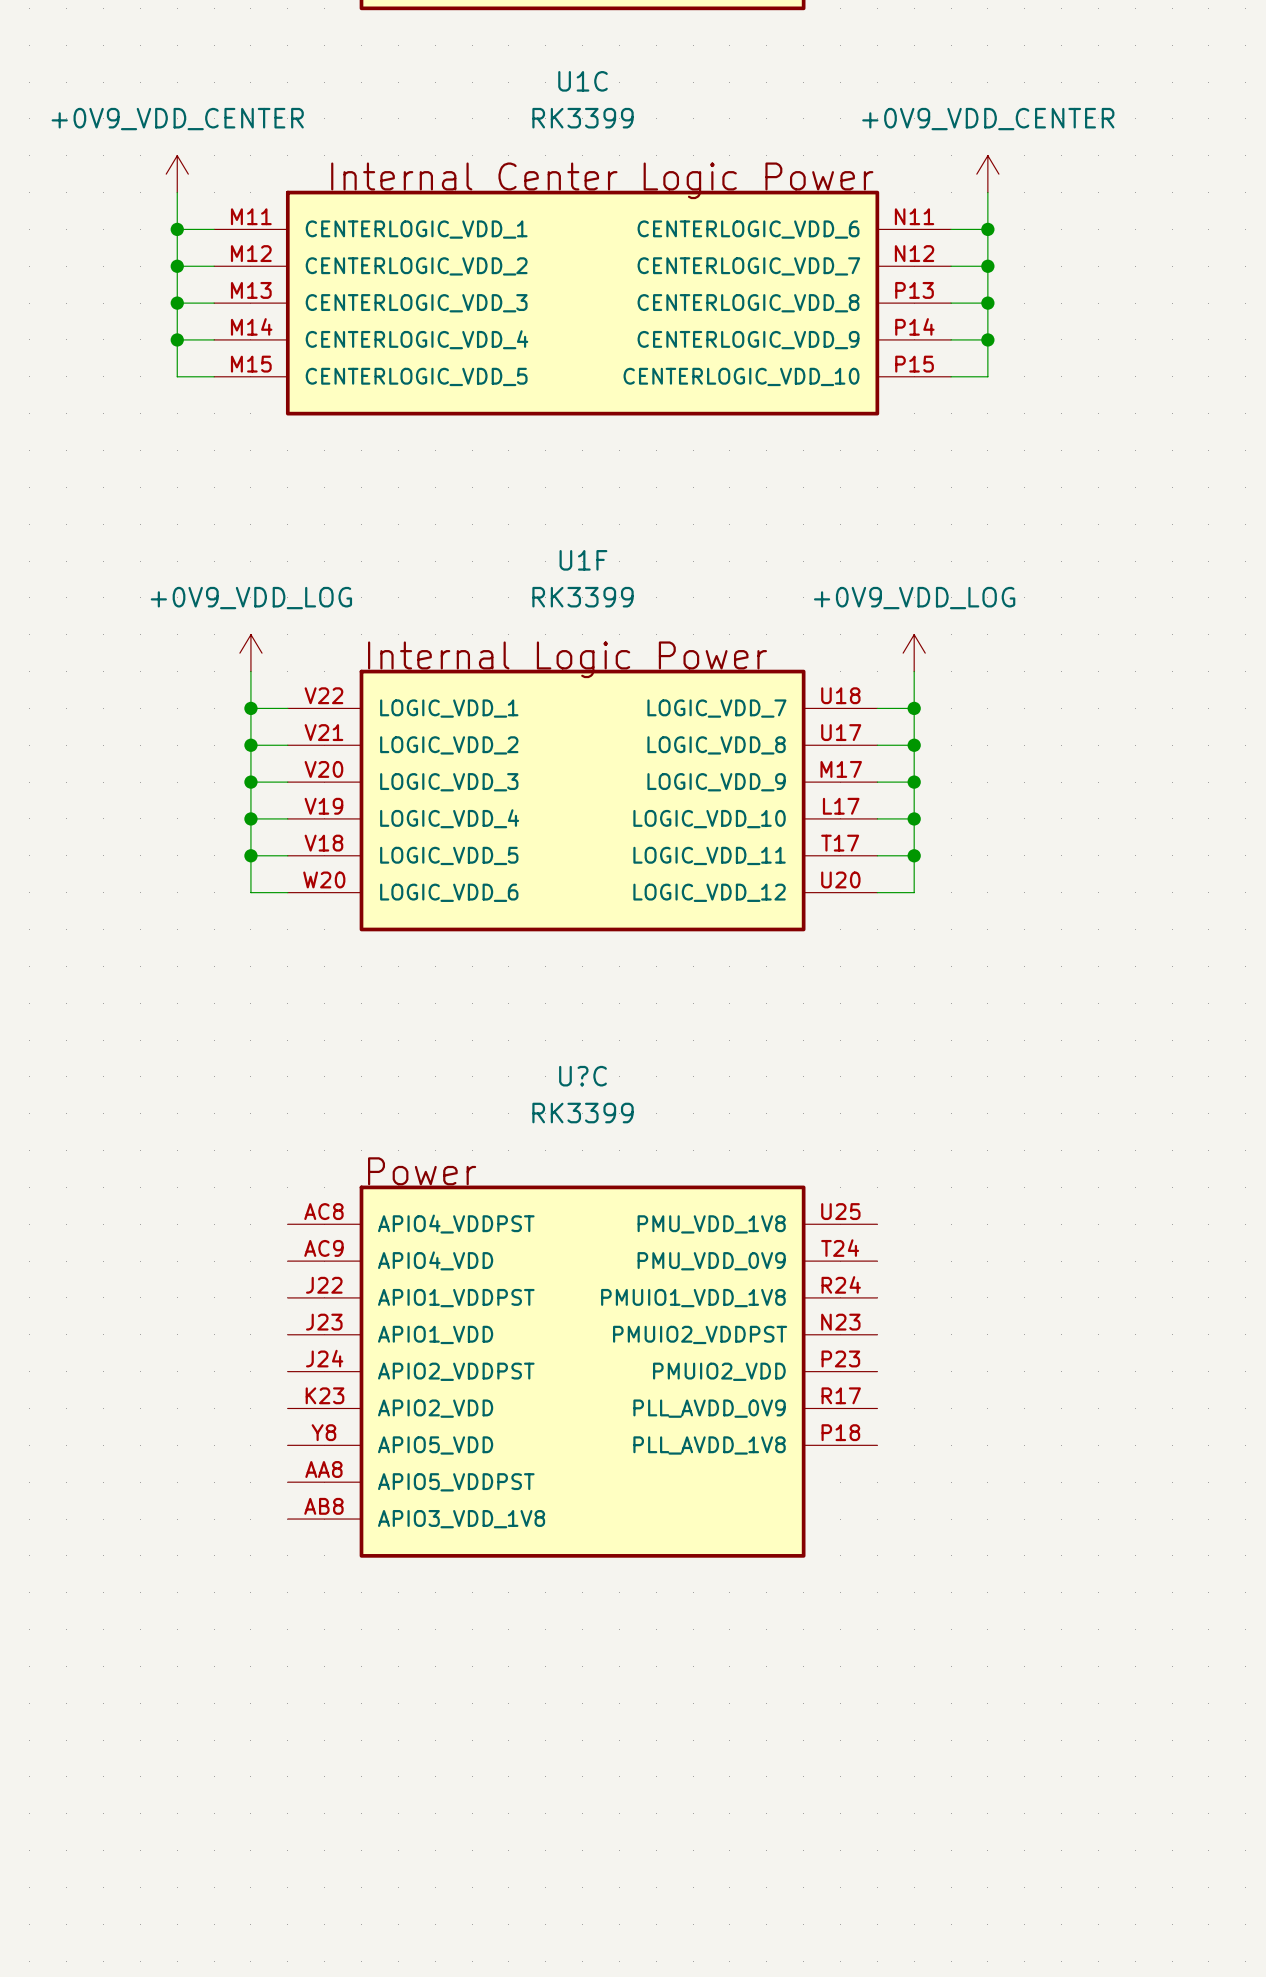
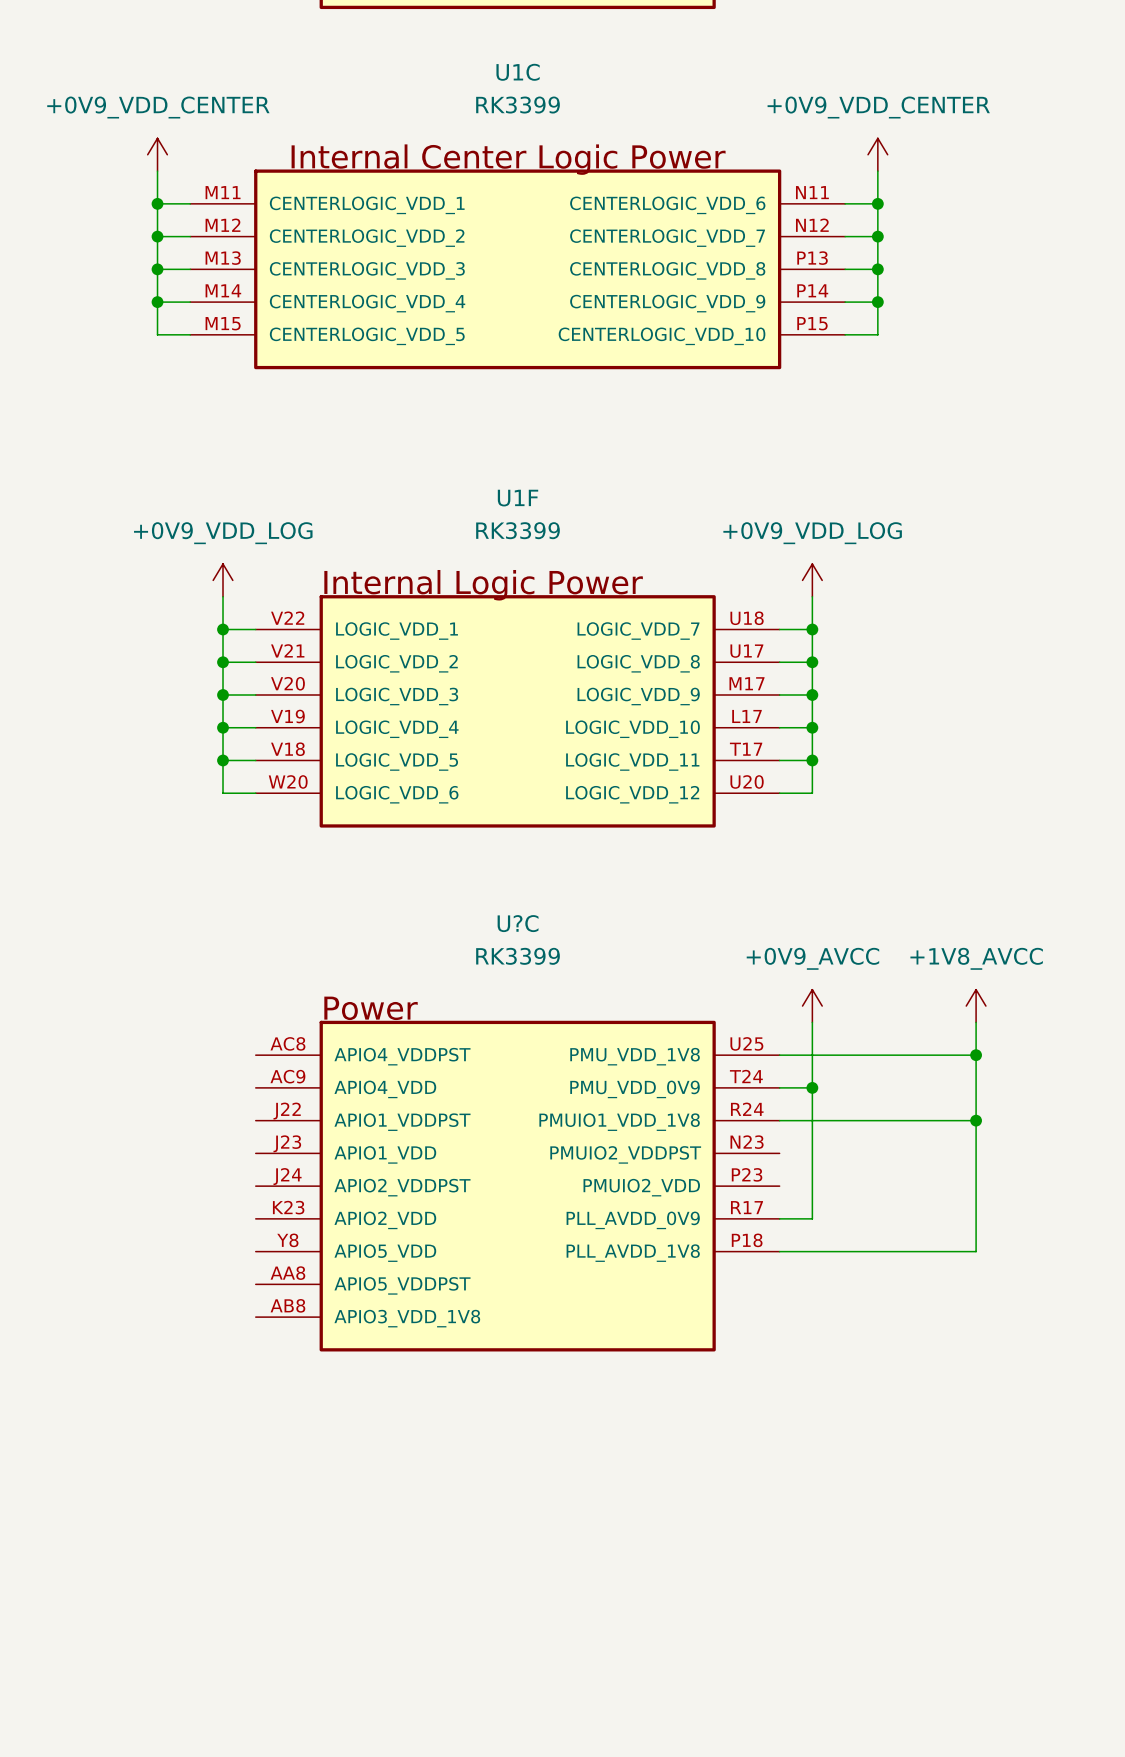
power symbol: none -> +0V9_AVCC (812, 1006)
power symbol: none -> +1V8_AVCC (976, 1006)
wire: none -> (812, 1022) (812, 1218) (779, 1218)
wire: none -> (976, 1022) (976, 1251) (779, 1251)
wire: none -> (779, 1055) (976, 1055)
junction: none -> (976, 1055)
wire: none -> (779, 1087) (812, 1087)
junction: none -> (812, 1087)
wire: none -> (779, 1120) (976, 1120)
junction: none -> (976, 1120)
U?C position: (582, 1371) -> (517, 1186)

